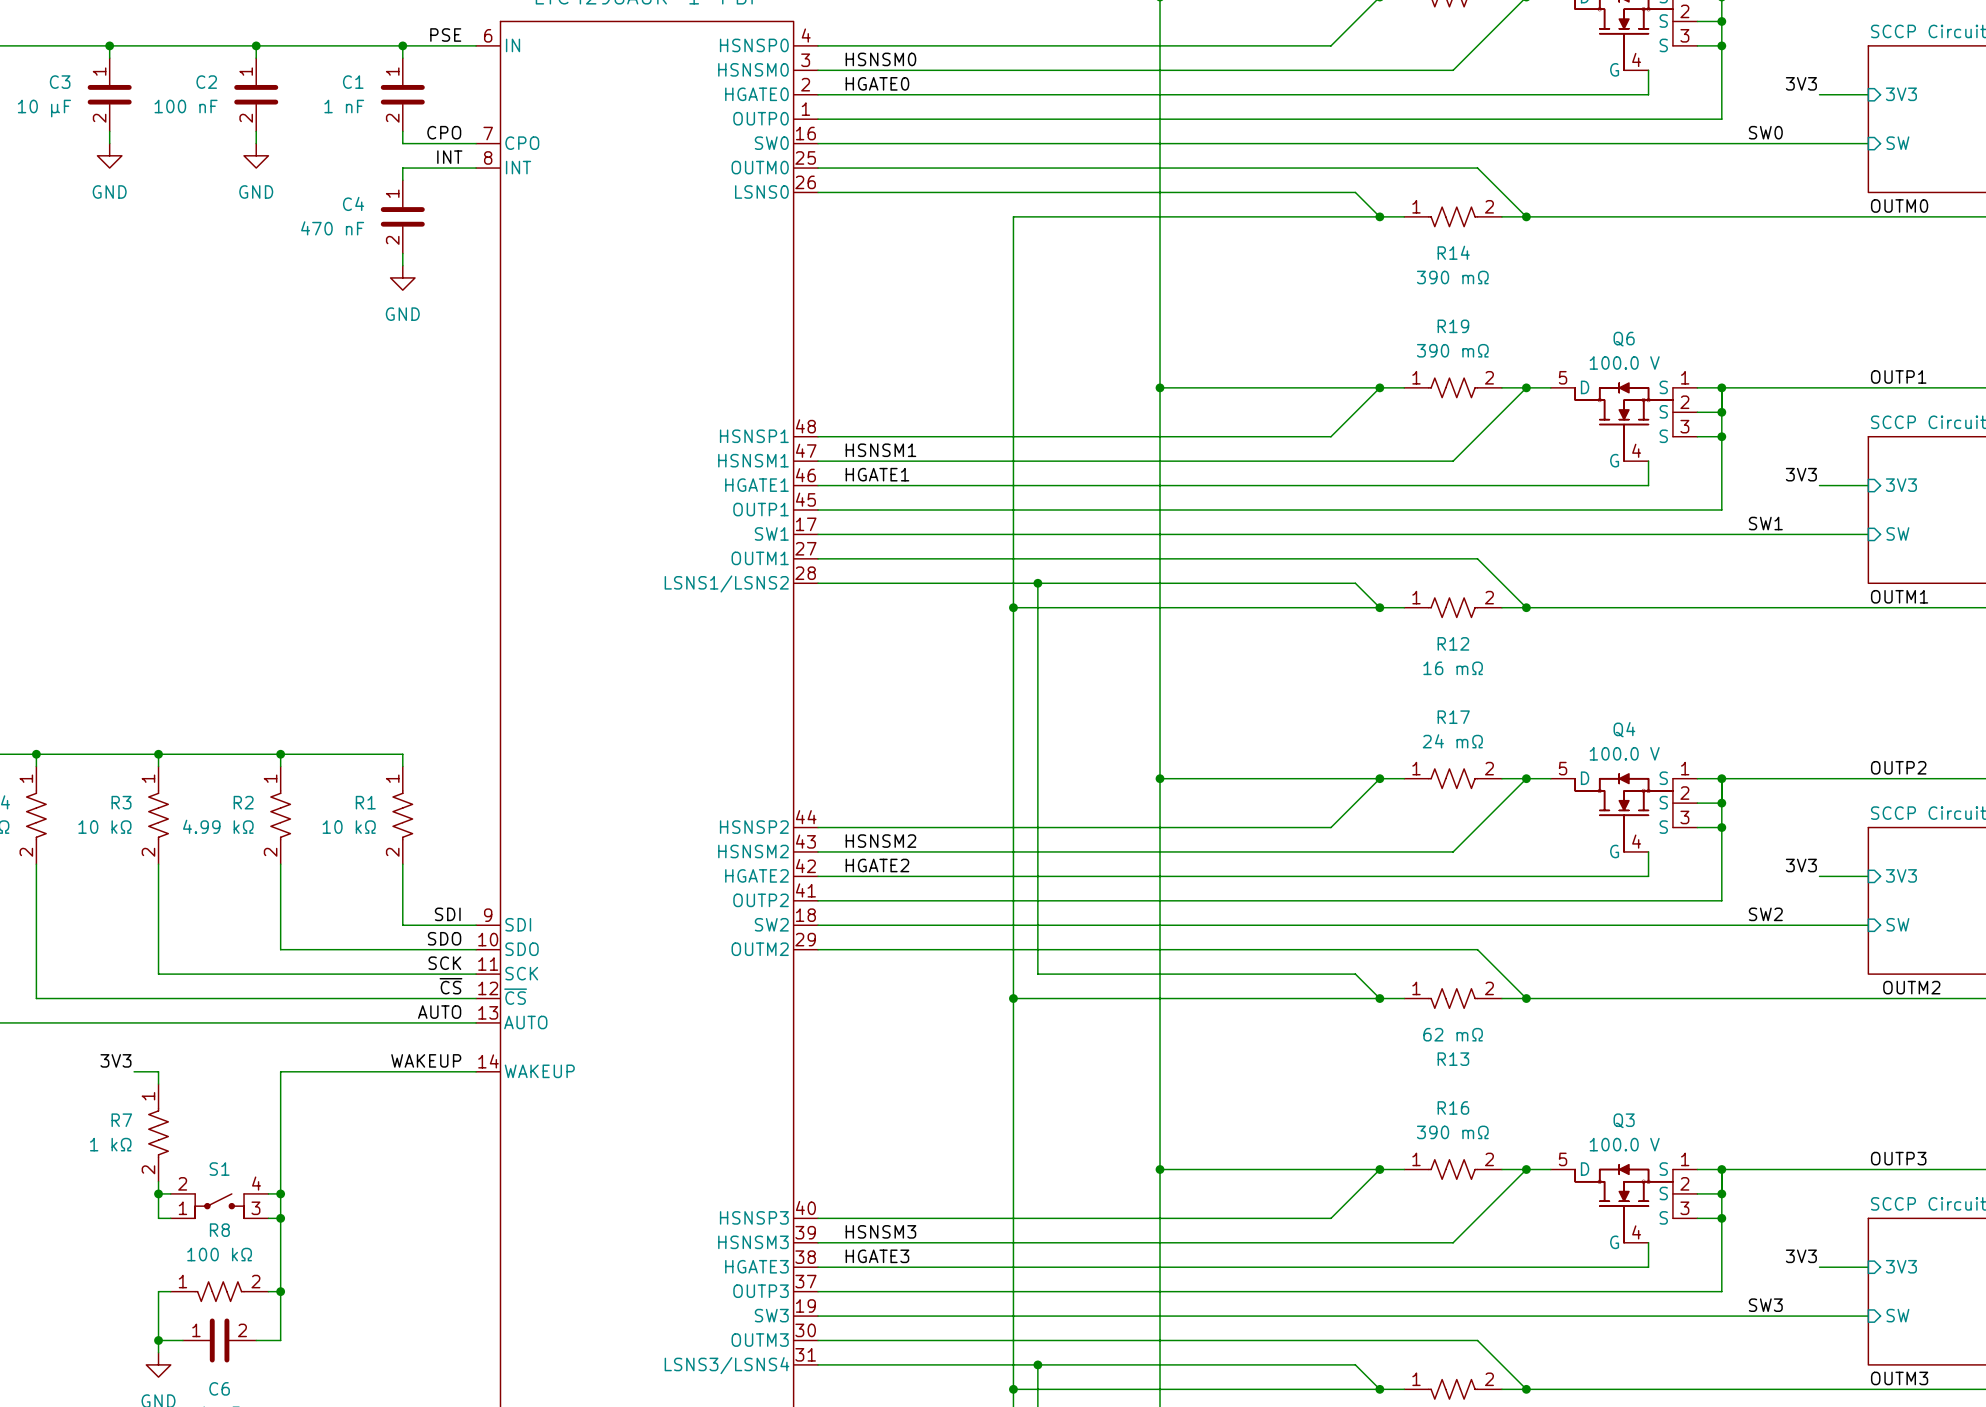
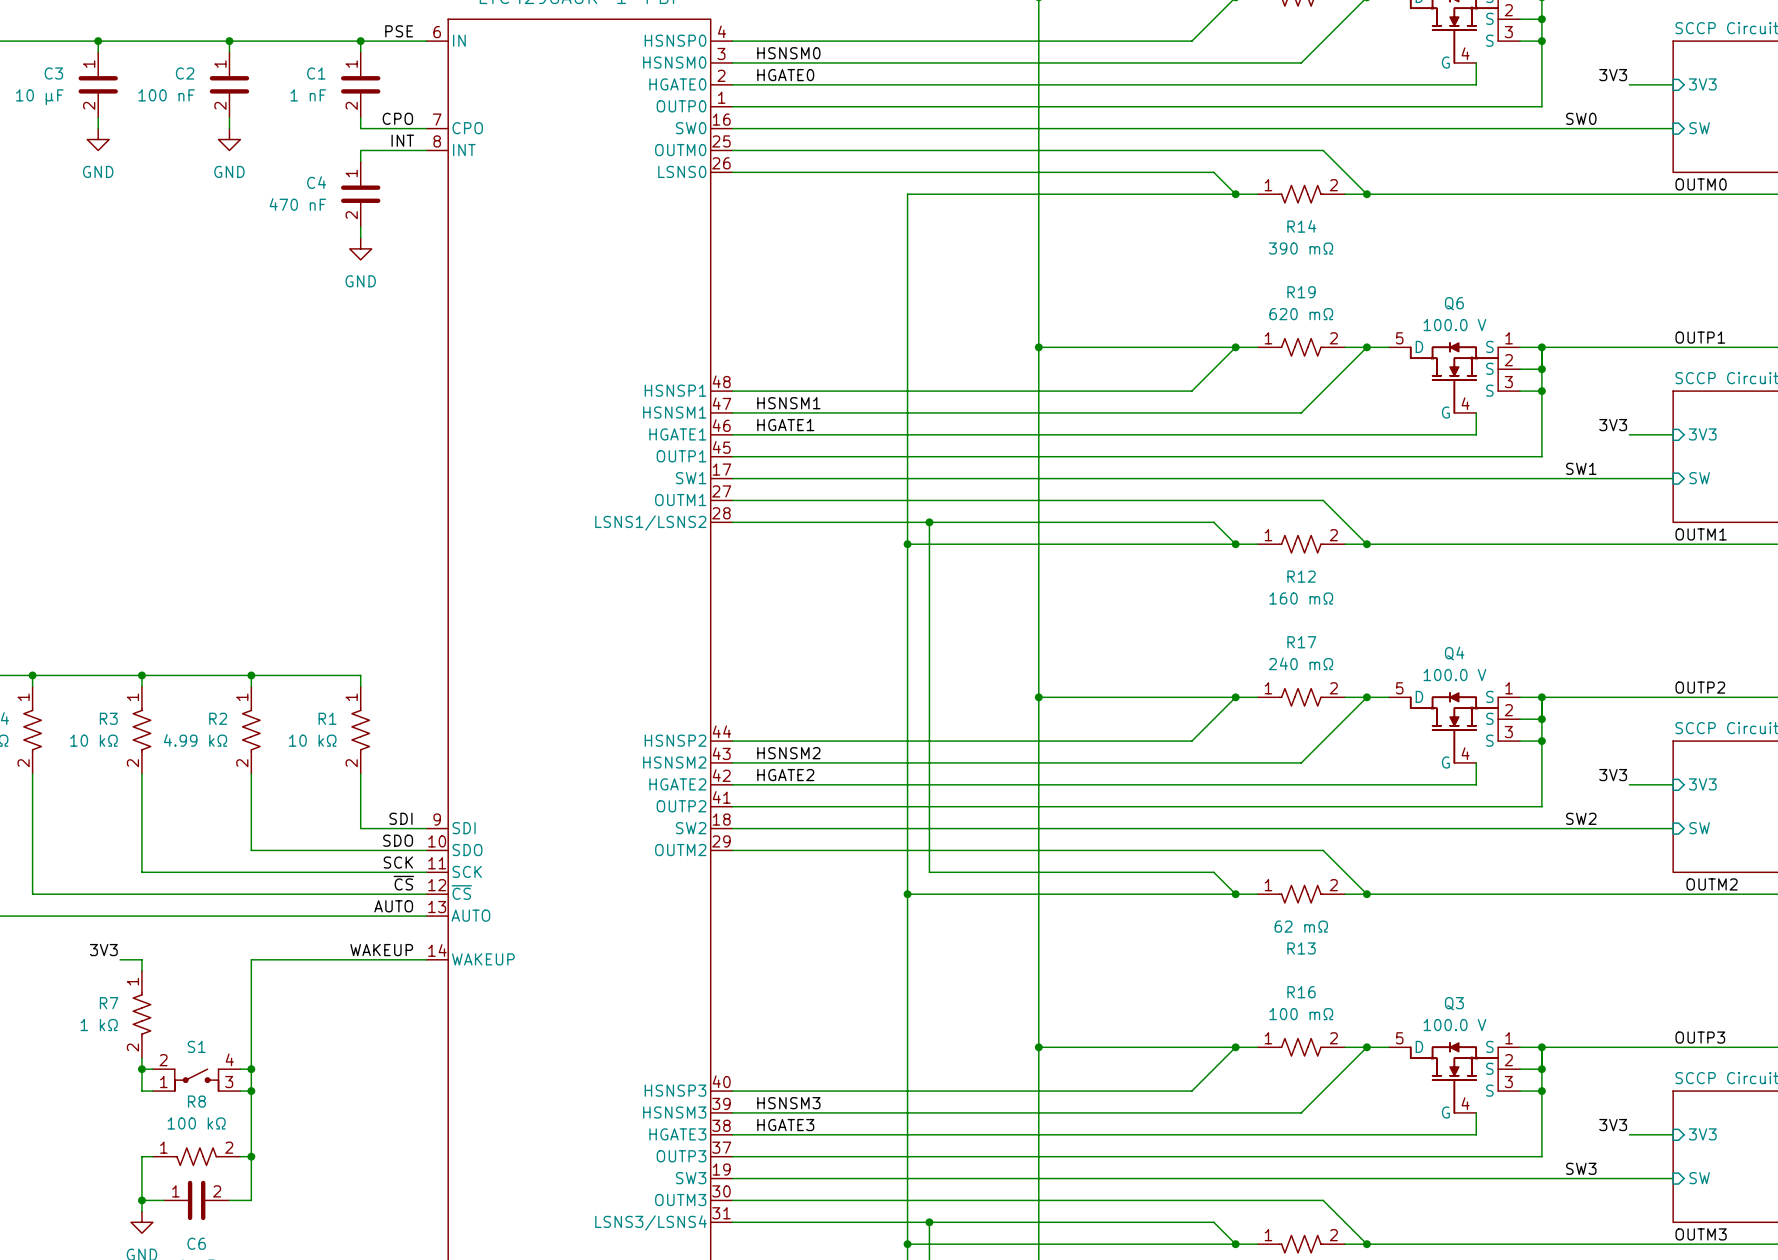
R19 value: 390 mΩ (1452, 350) -> 620 mΩ (1301, 314)
R12 value: 16 mΩ (1453, 668) -> 160 mΩ (1301, 598)
R17 value: 24 mΩ (1452, 741) -> 240 mΩ (1301, 663)
R16 value: 390 mΩ (1452, 1132) -> 100 mΩ (1301, 1014)

